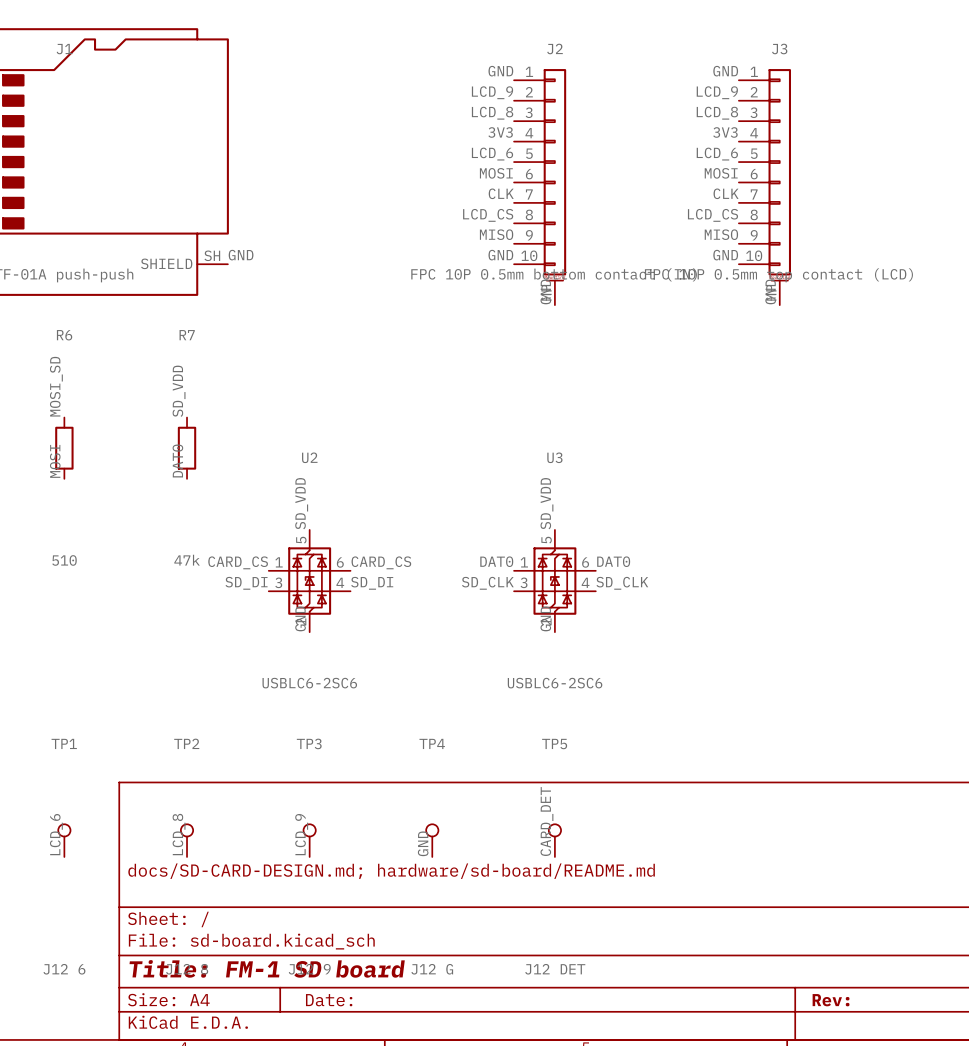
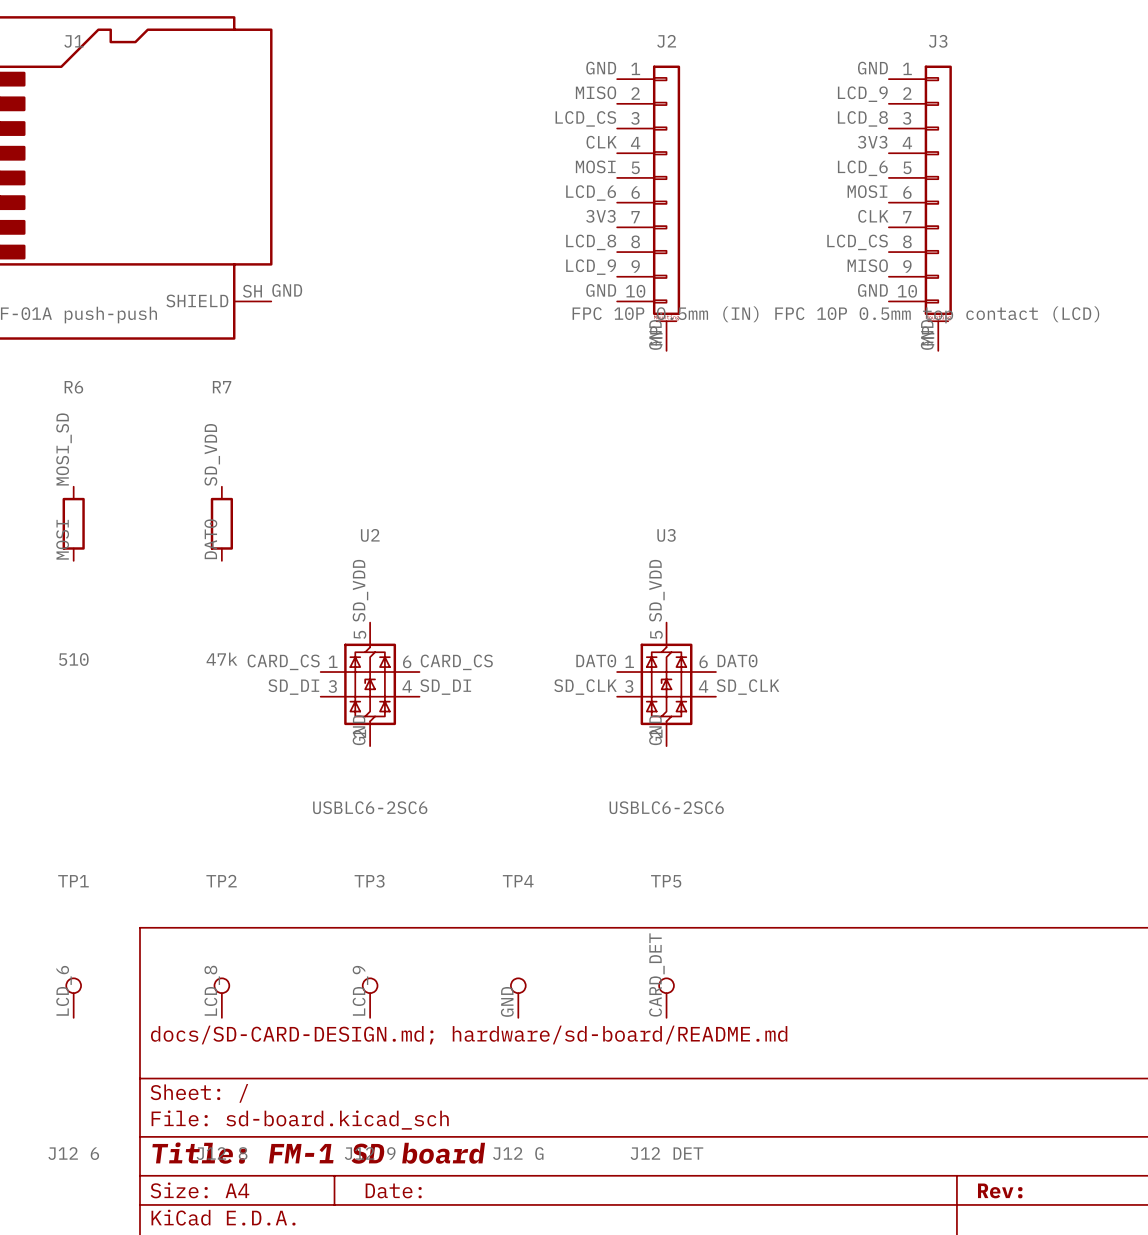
label: LCD_9 (492, 92) -> MISO (596, 92)
label: LCD_8 (492, 113) -> LCD_CS (585, 118)
label: 3V3 (500, 132) -> CLK (601, 142)
label: LCD_6 (492, 154) -> MOSI (595, 166)
label: MOSI (496, 173) -> LCD_6 (591, 193)
label: CLK (501, 193) -> 3V3 (600, 216)
label: LCD_CS (488, 215) -> LCD_8 (591, 242)
label: MISO (496, 234) -> LCD_9 (591, 267)
J2 value: FPC 10P 0.5mm bottom contact (IN) (554, 274) -> FPC 10P 0.5mm (IN) (665, 314)

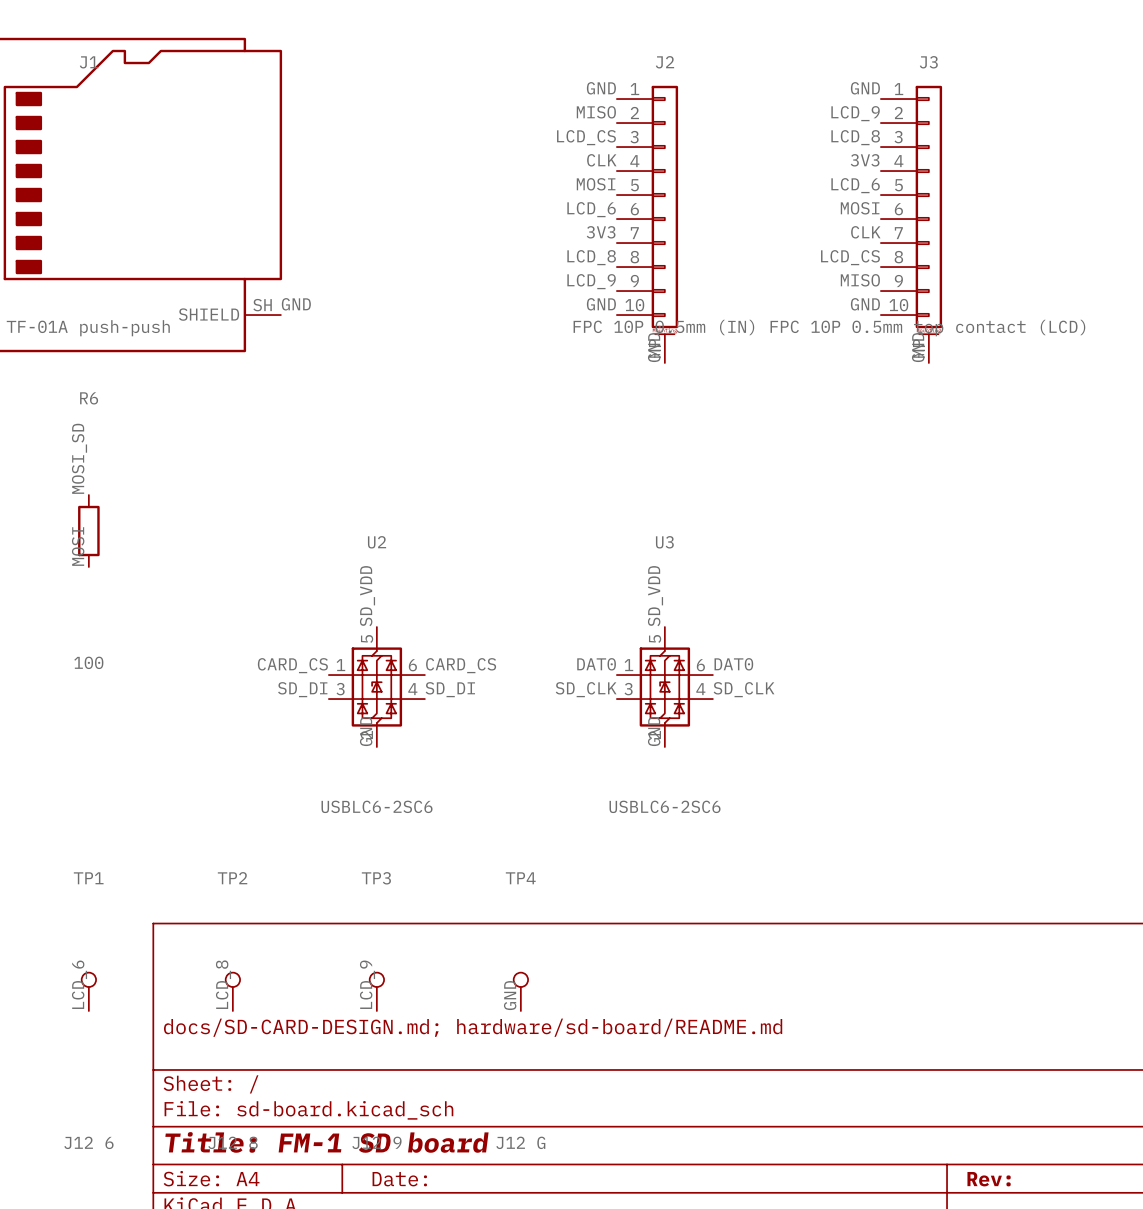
label: SD_VDD (212, 454) -> none
R7: 47k (221, 523) -> none
label: DAT0 (210, 539) -> none
R6 value: 510 (73, 659) -> 100 (88, 662)
label: CARD_DET (656, 974) -> none
TP5: J12 DET (666, 998) -> none

